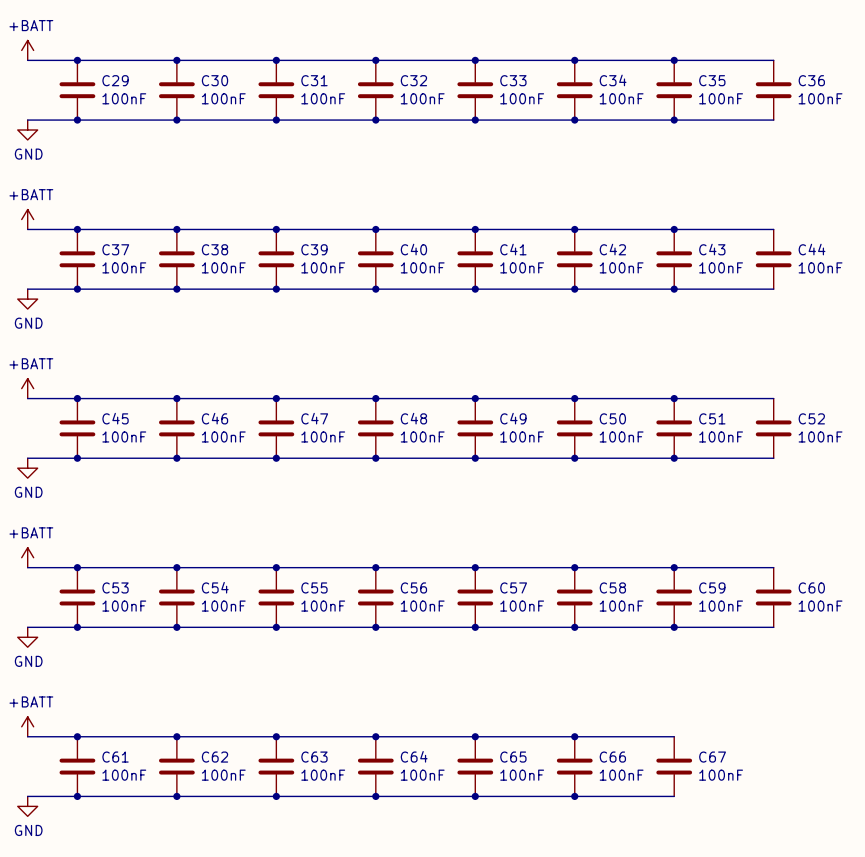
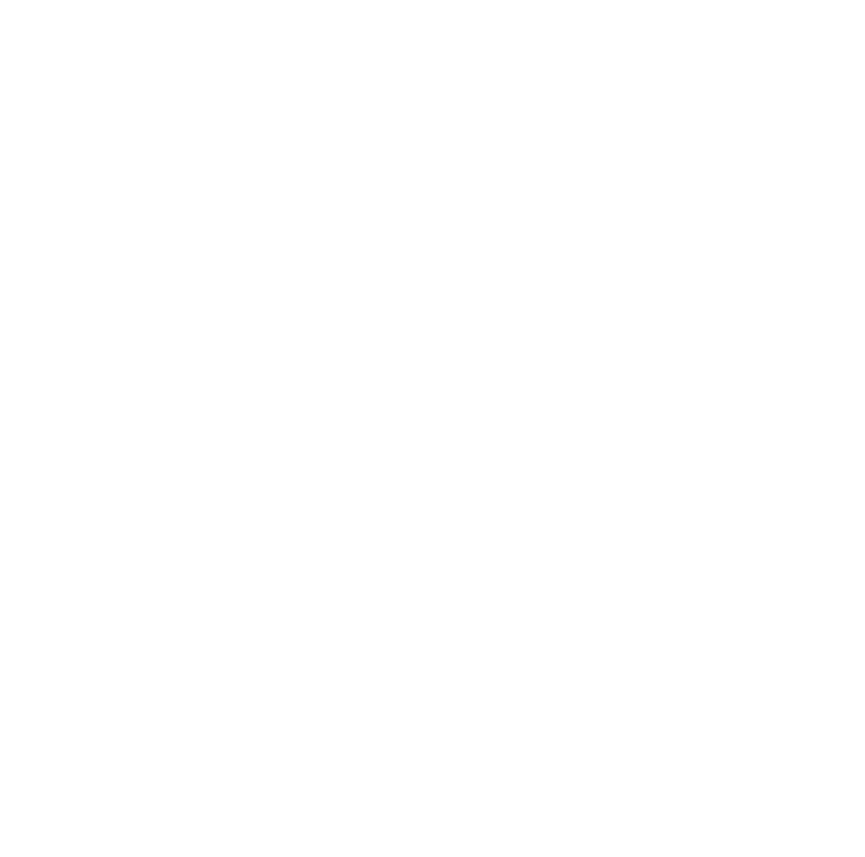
power symbol: +BATT (27, 50) -> none
wire: (27, 60) (773, 60) -> none
junction: (77, 60) -> none
junction: (176, 60) -> none
junction: (276, 60) -> none
junction: (375, 60) -> none
junction: (475, 60) -> none
junction: (574, 60) -> none
junction: (674, 60) -> none
C29: 100nF (77, 90) -> none
C30: 100nF (176, 90) -> none
C31: 100nF (276, 90) -> none
C32: 100nF (375, 90) -> none
C33: 100nF (475, 90) -> none
C34: 100nF (574, 90) -> none
C35: 100nF (674, 90) -> none
C36: 100nF (773, 90) -> none
wire: (27, 120) (773, 120) -> none
junction: (77, 120) -> none
junction: (176, 120) -> none
junction: (276, 120) -> none
junction: (375, 120) -> none
junction: (475, 120) -> none
junction: (574, 120) -> none
junction: (674, 120) -> none
power symbol: GND (27, 130) -> none
power symbol: +BATT (27, 219) -> none
wire: (27, 229) (773, 229) -> none
junction: (77, 229) -> none
junction: (176, 229) -> none
junction: (276, 229) -> none
junction: (375, 229) -> none
junction: (475, 229) -> none
junction: (574, 229) -> none
junction: (674, 229) -> none
C37: 100nF (77, 259) -> none
C38: 100nF (176, 259) -> none
C39: 100nF (276, 259) -> none
C40: 100nF (375, 259) -> none
C41: 100nF (475, 259) -> none
C42: 100nF (574, 259) -> none
C43: 100nF (674, 259) -> none
C44: 100nF (773, 259) -> none
wire: (27, 289) (773, 289) -> none
junction: (77, 289) -> none
junction: (176, 289) -> none
junction: (276, 289) -> none
junction: (375, 289) -> none
junction: (475, 289) -> none
junction: (574, 289) -> none
junction: (674, 289) -> none
power symbol: GND (27, 299) -> none
power symbol: +BATT (27, 388) -> none
wire: (27, 398) (773, 398) -> none
junction: (77, 398) -> none
junction: (176, 398) -> none
junction: (276, 398) -> none
junction: (375, 398) -> none
junction: (475, 398) -> none
junction: (574, 398) -> none
junction: (674, 398) -> none
C45: 100nF (77, 428) -> none
C46: 100nF (176, 428) -> none
C47: 100nF (276, 428) -> none
C48: 100nF (375, 428) -> none
C49: 100nF (475, 428) -> none
C50: 100nF (574, 428) -> none
C51: 100nF (674, 428) -> none
C52: 100nF (773, 428) -> none
wire: (27, 458) (773, 458) -> none
junction: (77, 458) -> none
junction: (176, 458) -> none
junction: (276, 458) -> none
junction: (375, 458) -> none
junction: (475, 458) -> none
junction: (574, 458) -> none
junction: (674, 458) -> none
power symbol: GND (27, 468) -> none
power symbol: +BATT (27, 557) -> none
wire: (27, 567) (773, 567) -> none
junction: (77, 567) -> none
junction: (176, 567) -> none
junction: (276, 567) -> none
junction: (375, 567) -> none
junction: (475, 567) -> none
junction: (574, 567) -> none
junction: (674, 567) -> none
C53: 100nF (77, 597) -> none
C54: 100nF (176, 597) -> none
C55: 100nF (276, 597) -> none
C56: 100nF (375, 597) -> none
C57: 100nF (475, 597) -> none
C58: 100nF (574, 597) -> none
C59: 100nF (674, 597) -> none
C60: 100nF (773, 597) -> none
wire: (27, 627) (773, 627) -> none
junction: (77, 627) -> none
junction: (176, 627) -> none
junction: (276, 627) -> none
junction: (375, 627) -> none
junction: (475, 627) -> none
junction: (574, 627) -> none
junction: (674, 627) -> none
power symbol: GND (27, 637) -> none
power symbol: +BATT (27, 726) -> none
wire: (27, 736) (674, 736) -> none
junction: (77, 736) -> none
junction: (176, 736) -> none
junction: (276, 736) -> none
junction: (375, 736) -> none
junction: (475, 736) -> none
junction: (574, 736) -> none
C61: 100nF (77, 766) -> none
C62: 100nF (176, 766) -> none
C63: 100nF (276, 766) -> none
C64: 100nF (375, 766) -> none
C65: 100nF (475, 766) -> none
C66: 100nF (574, 766) -> none
C67: 100nF (674, 766) -> none
wire: (27, 796) (674, 796) -> none
junction: (77, 796) -> none
junction: (176, 796) -> none
junction: (276, 796) -> none
junction: (375, 796) -> none
junction: (475, 796) -> none
junction: (574, 796) -> none
power symbol: GND (27, 806) -> none

